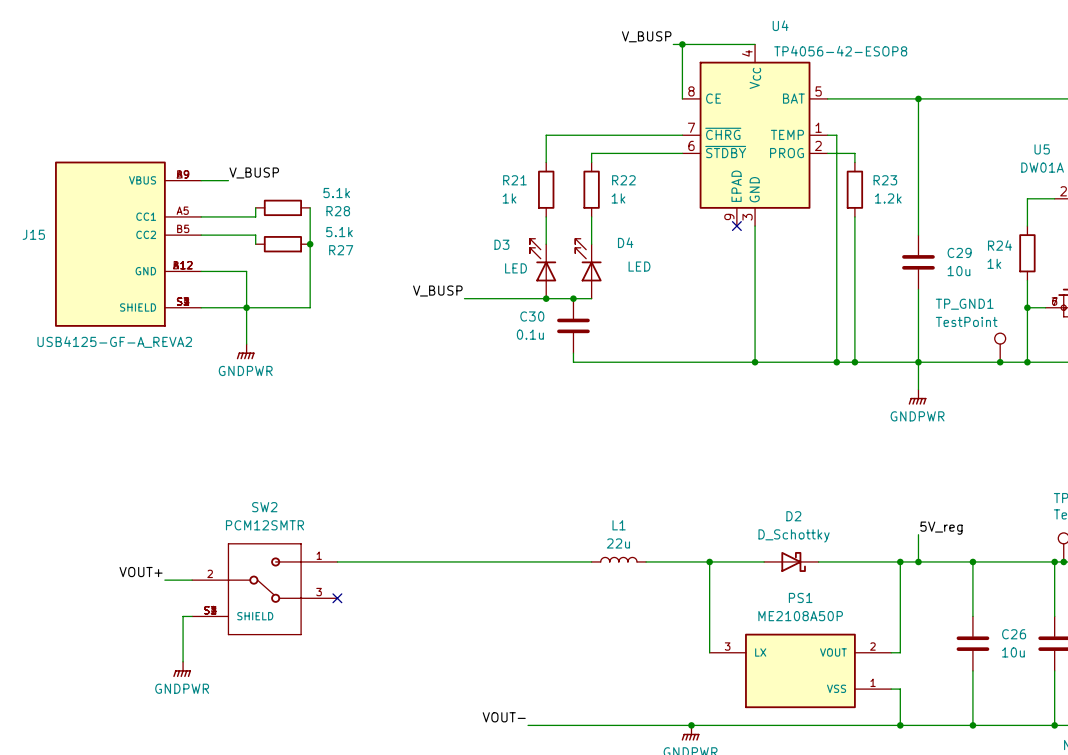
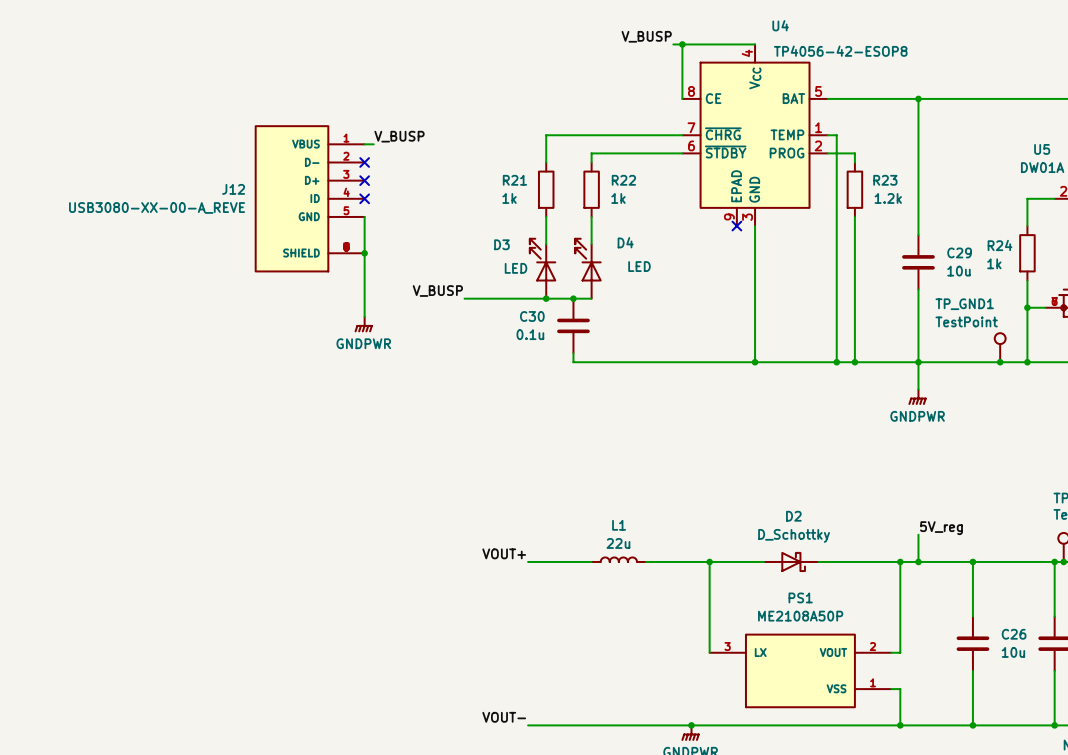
wire: none -> (364, 144) (373, 144)
no-connect mark: none -> (364, 162)
label position: V_BUSP (254, 172) -> V_BUSP (399, 136)
wire: (201, 180) (228, 180) -> none
no-connect mark: none -> (364, 180)
J12: none -> USB3080-XX-00-A_REVE (309, 198)
no-connect mark: none -> (364, 198)
wire: (255, 207) (255, 216) (201, 216) -> none
R28: 5.1k (282, 207) -> none
wire: (310, 207) (310, 307) (201, 307) -> none
wire: none -> (364, 216) (364, 316)
wire: (201, 235) (255, 235) (255, 244) -> none
J15: USB4125-GF-A_REVA2 (128, 244) -> none
R27: 5.1k (282, 244) -> none
junction: (310, 244) -> none
junction: none -> (364, 253)
wire: (201, 271) (246, 271) (246, 344) -> none
junction: (246, 307) -> none
power symbol position: GNDPWR (245, 351) -> GNDPWR (363, 324)
label: none -> VOUT+ (504, 553)
wire: (337, 561) (528, 561) -> none
label: VOUT+ (141, 572) -> none
wire: (164, 580) (192, 580) -> none
SW2: PCM12SMTR (264, 589) -> none
no-connect mark: (337, 598) -> none
wire: (192, 616) (183, 616) (183, 661) -> none
power symbol: GNDPWR (182, 669) -> none

